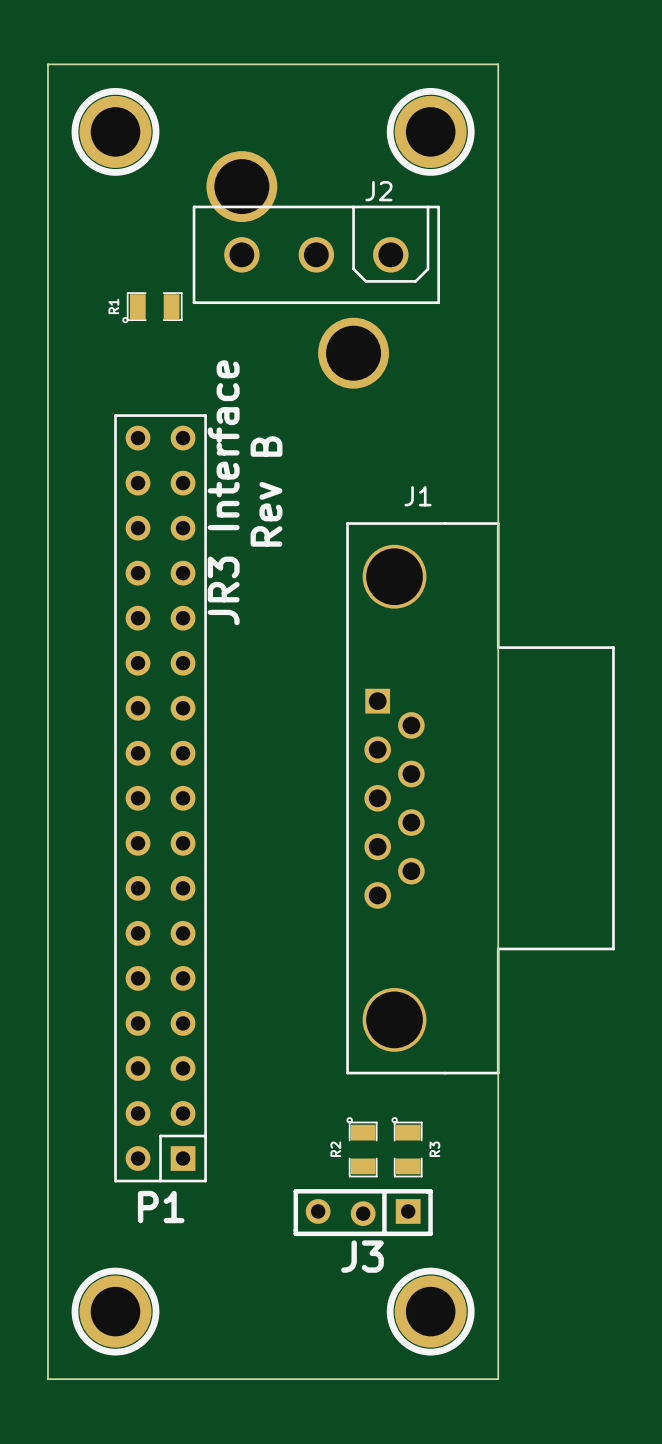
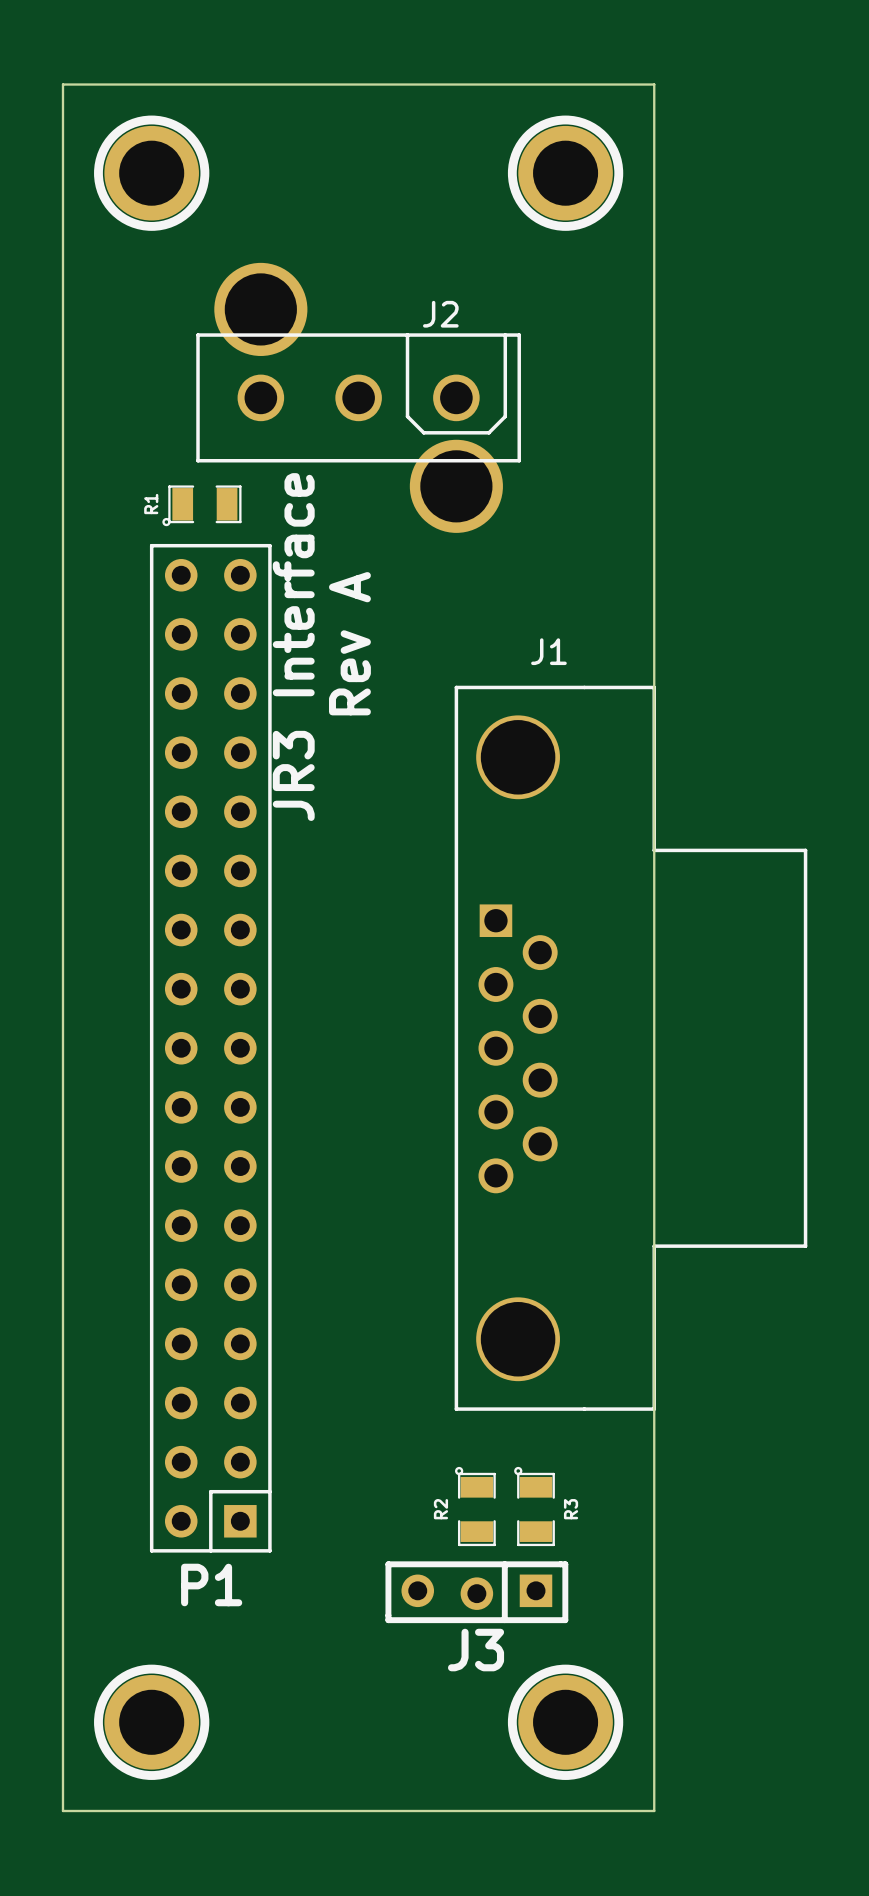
J2 footprint: [192, 151, 440, 389] -> [196, 262, 521, 533]
R1 position: (152, 307) -> (201, 505)
text: Rev B (266, 491) -> Rev A (349, 643)

